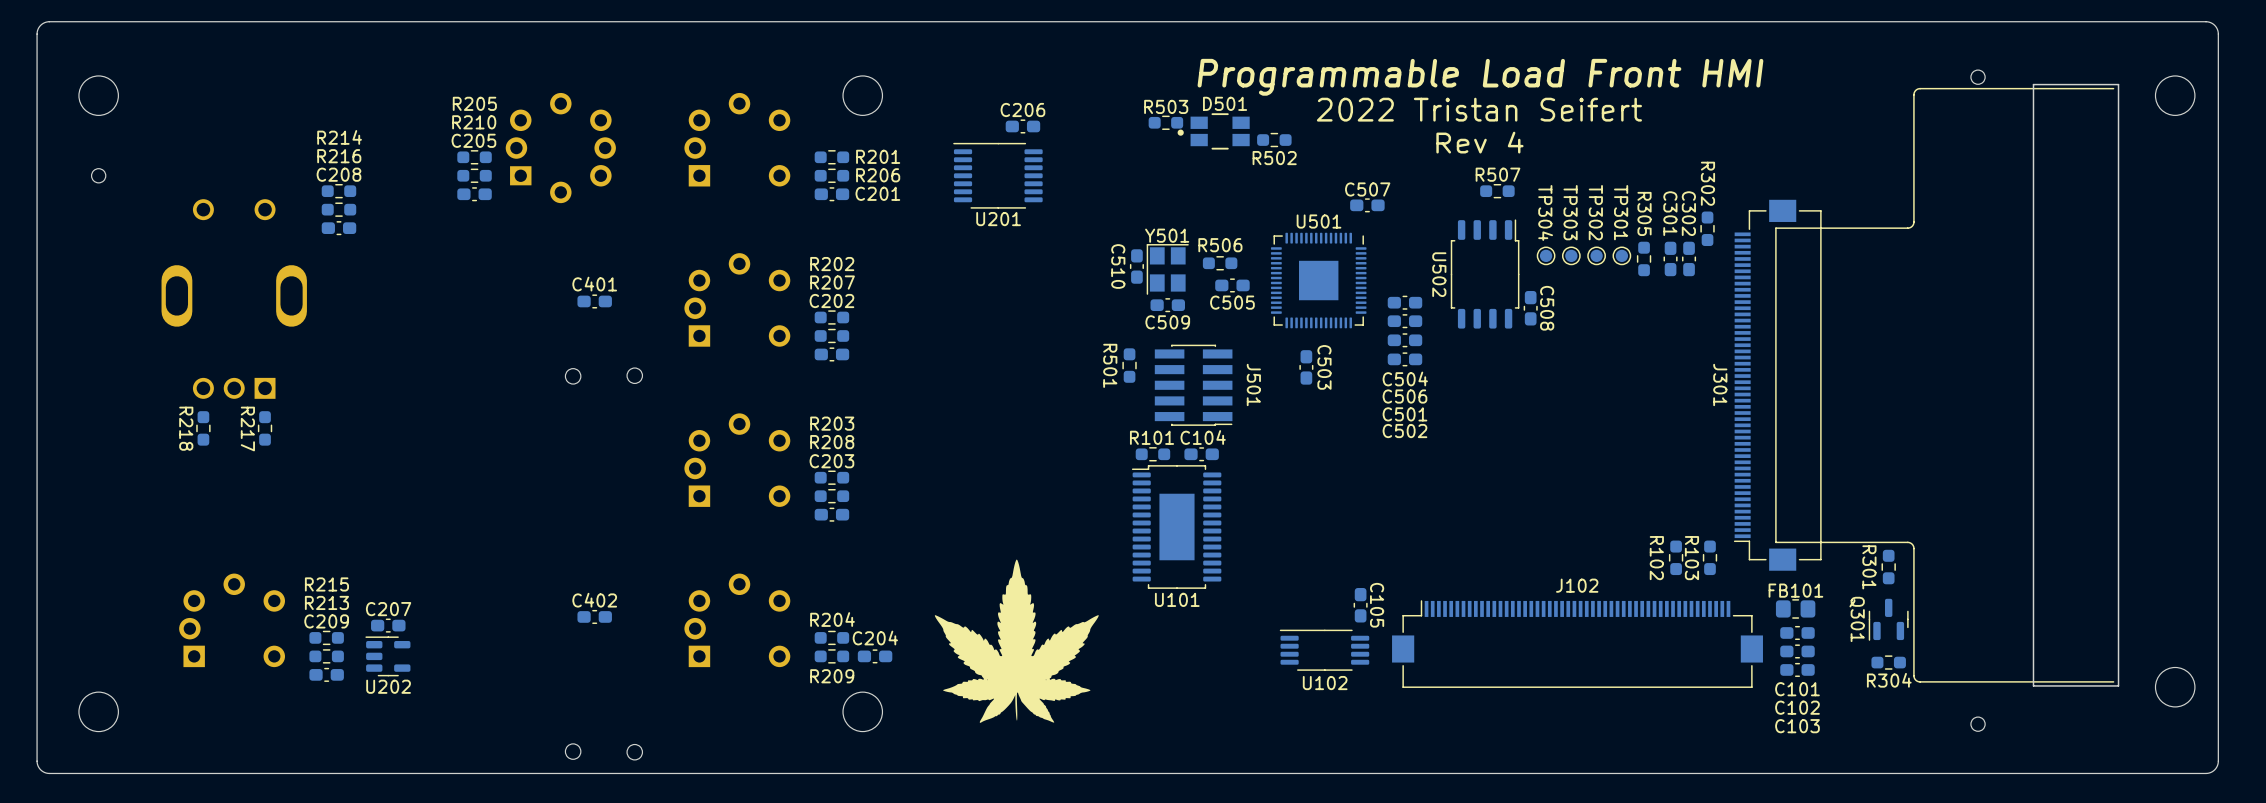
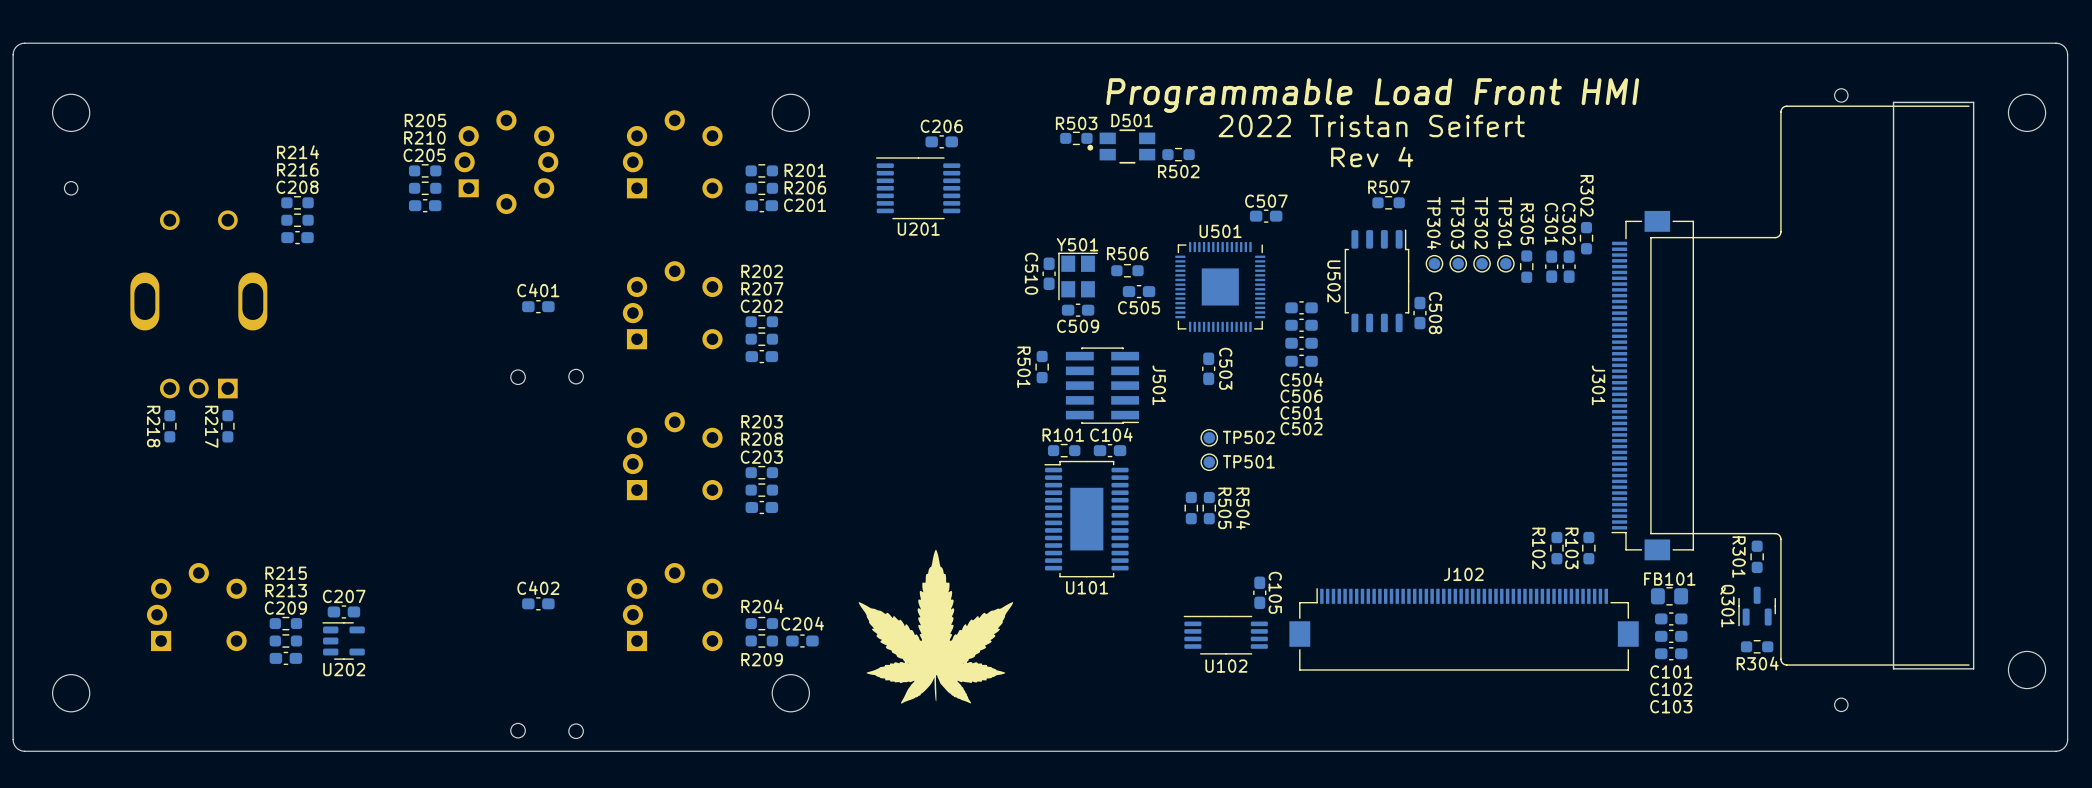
TP502: none -> (1209, 437)
TP501: none -> (1209, 462)
R505: none -> (1191, 508)
R504: none -> (1209, 508)

